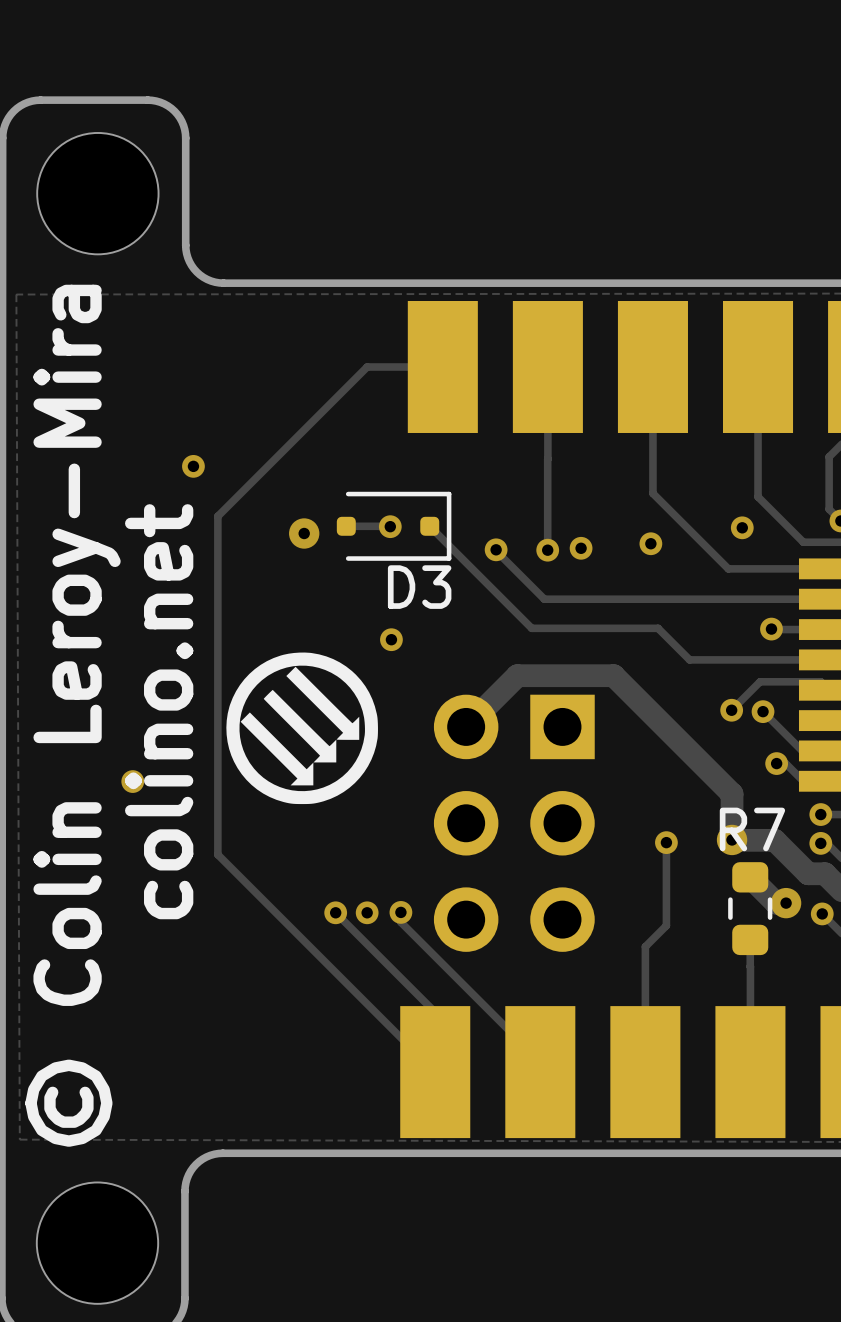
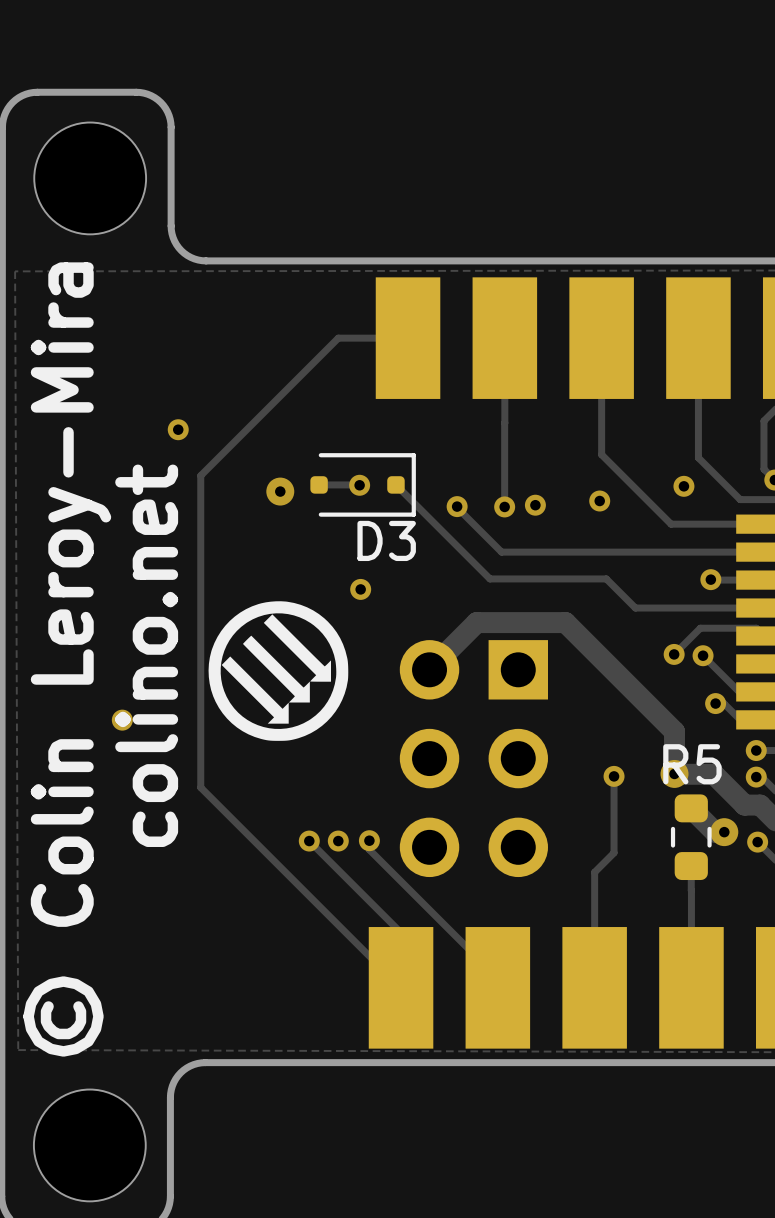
R7 name: R7 (752, 829) -> R5 (692, 764)

